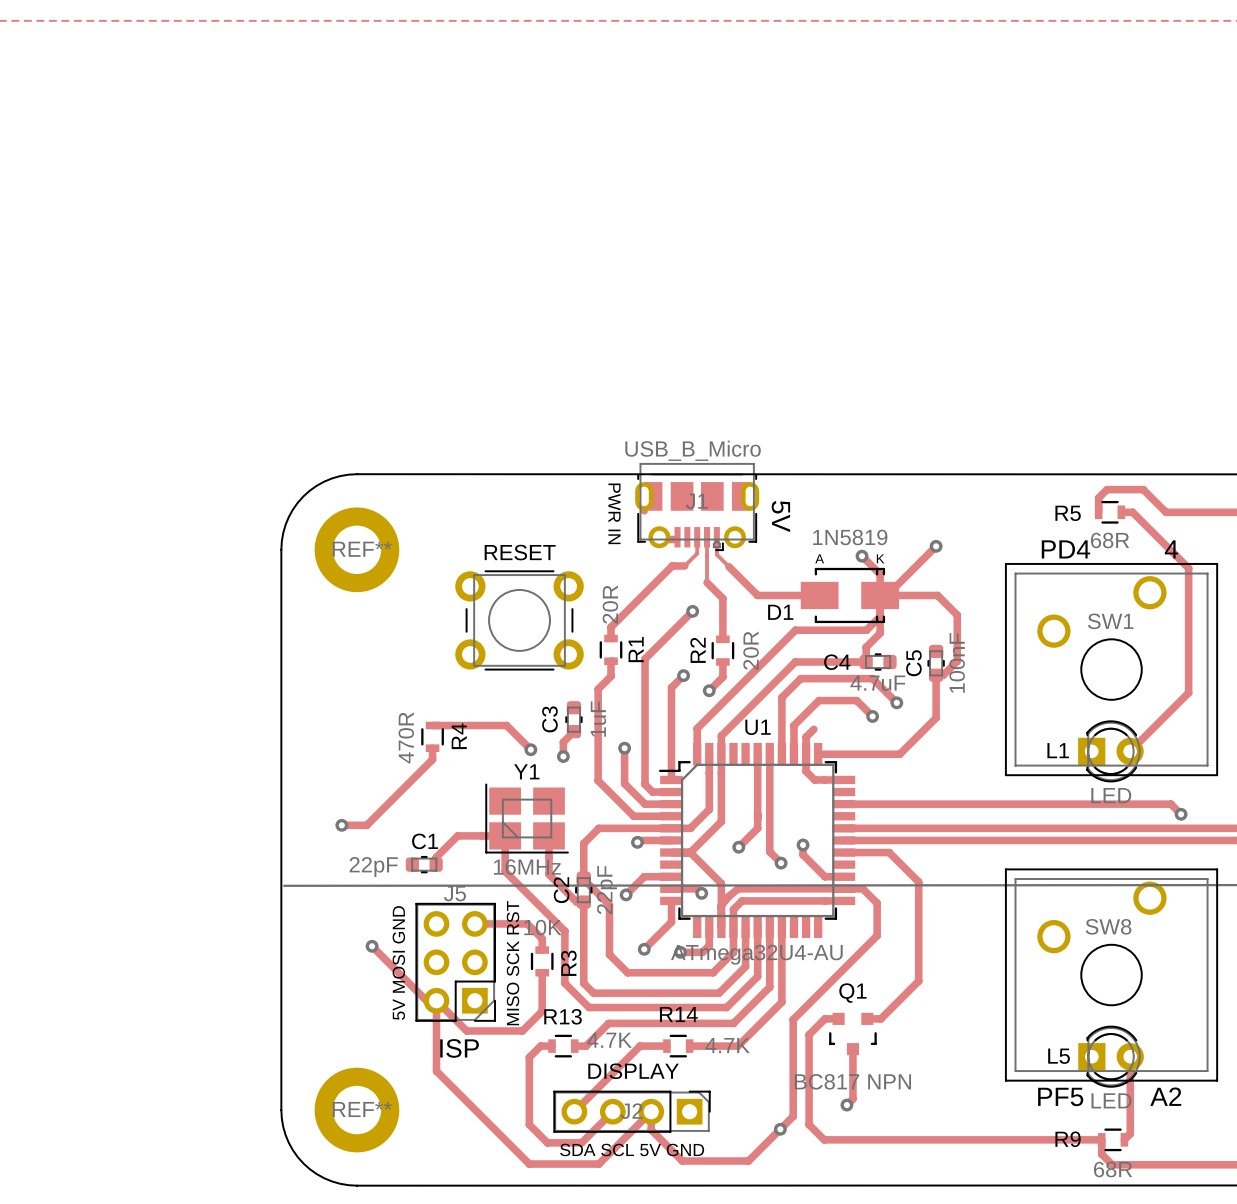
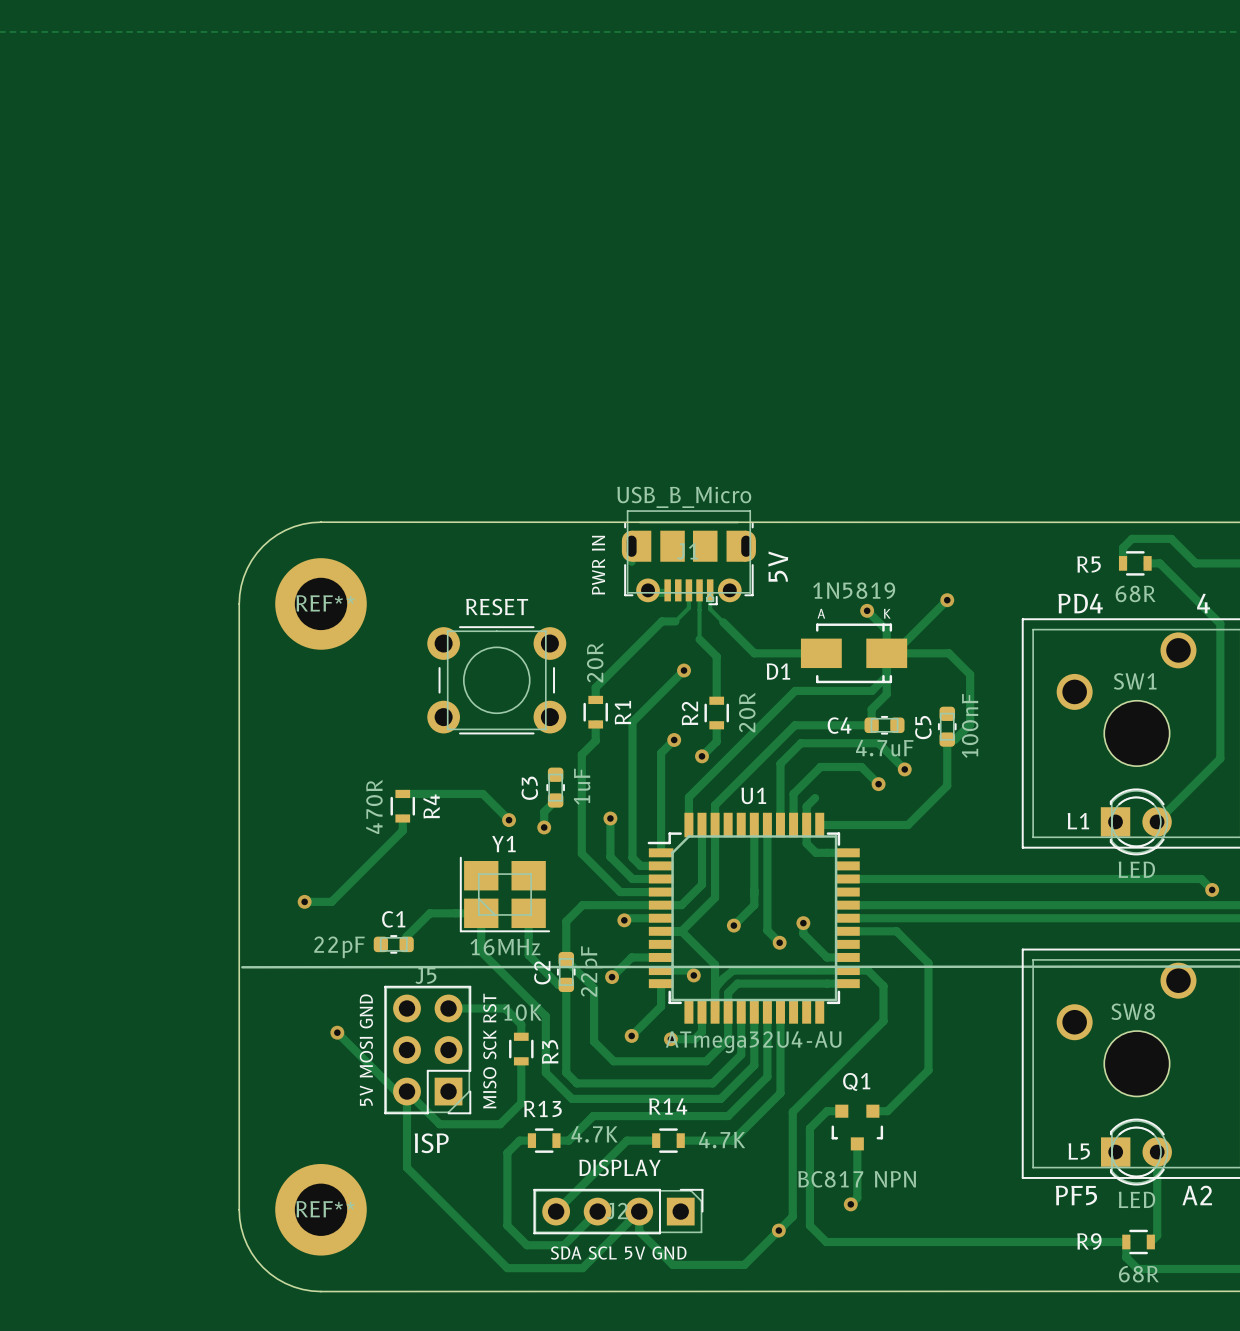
text rotation: 0° (614, 513) -> 180° (598, 565)
text rotation: 0° (780, 516) -> 180° (778, 566)

